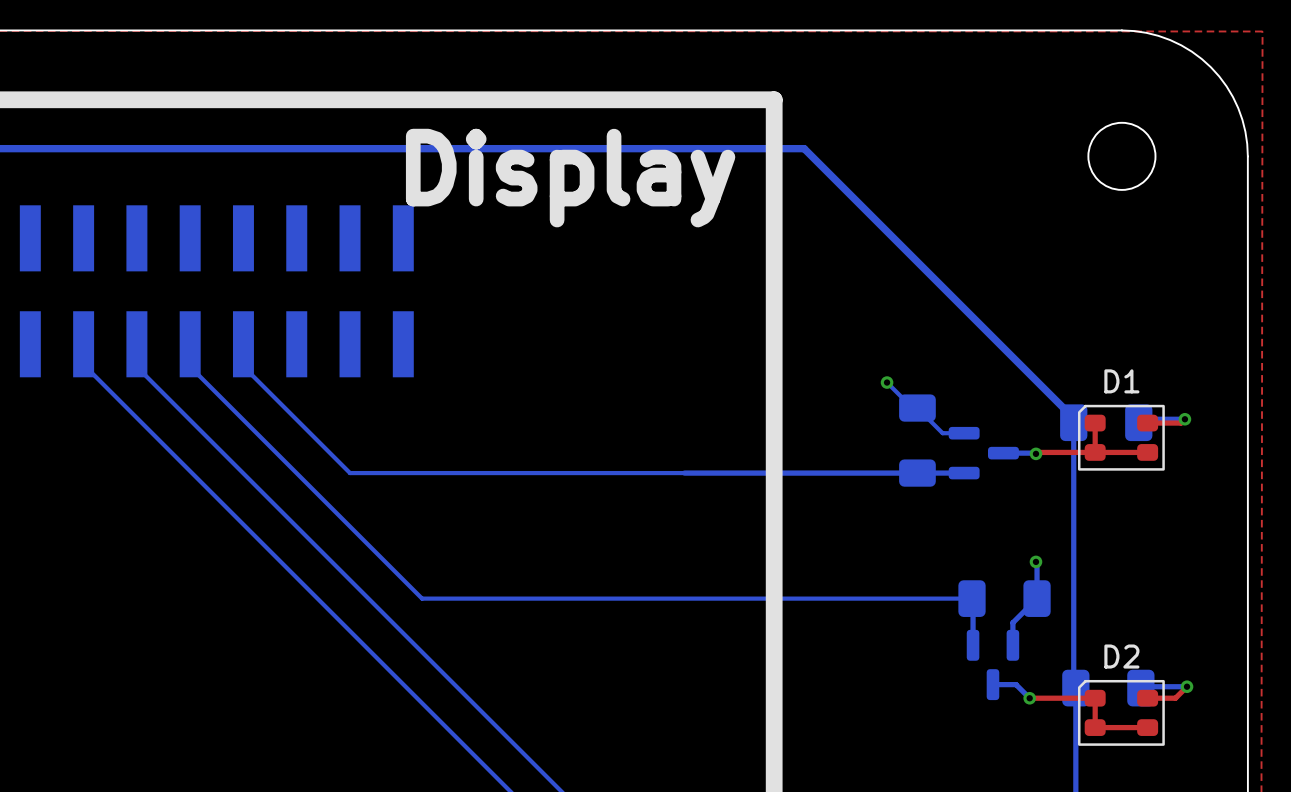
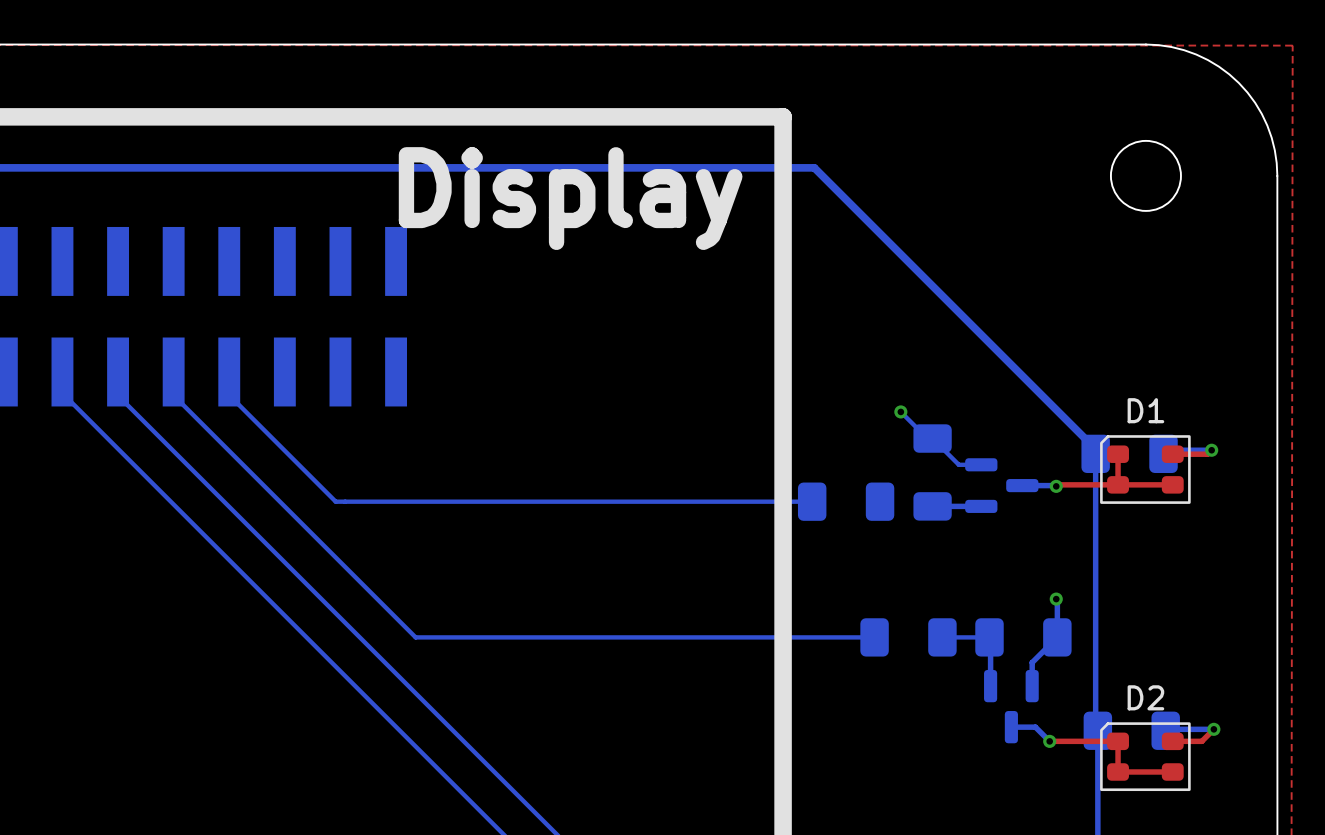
bottom track: (345, 468) (350, 473) (917, 473) (684, 473) -> (335, 501) (812, 501)
part: none -> (846, 501)
bottom track: (861, 598) (926, 598) -> none
part: none -> (908, 637)

